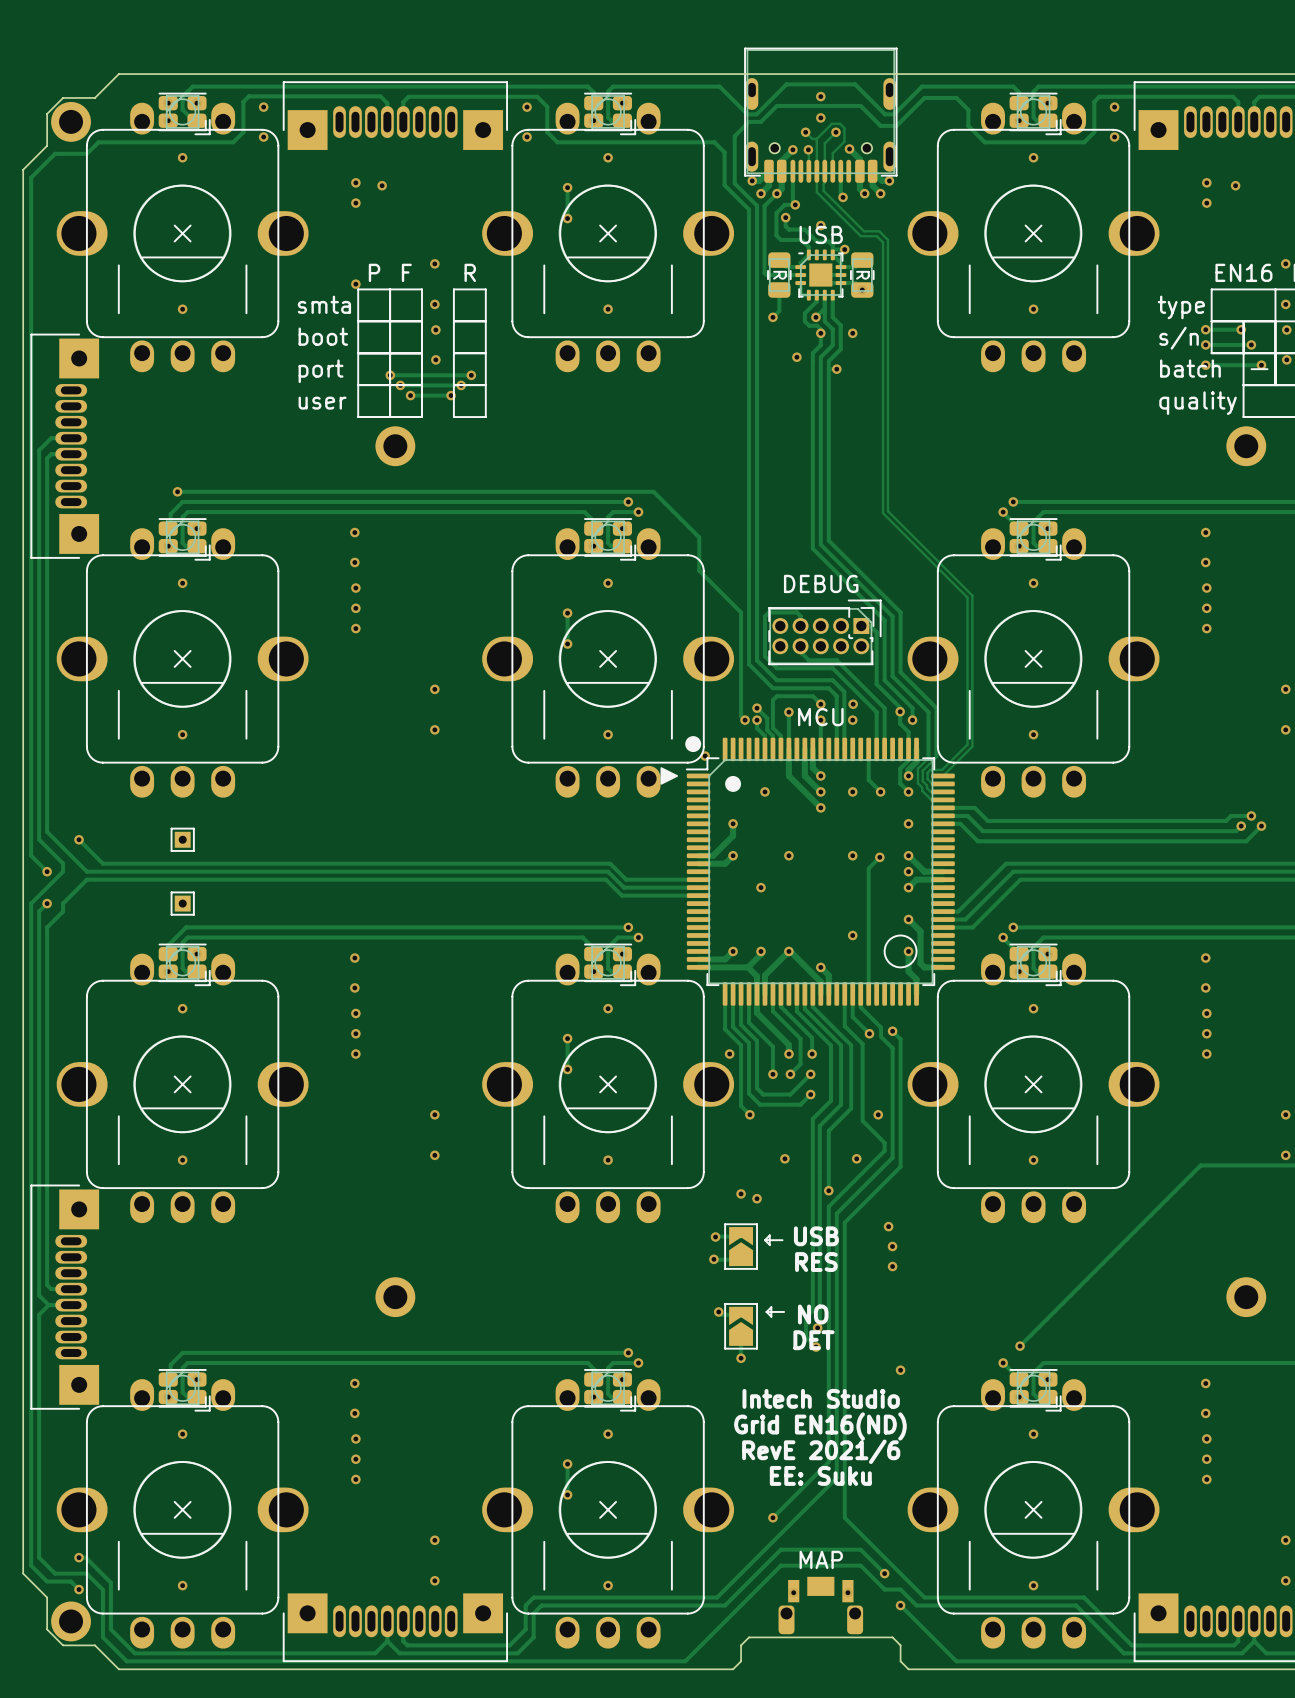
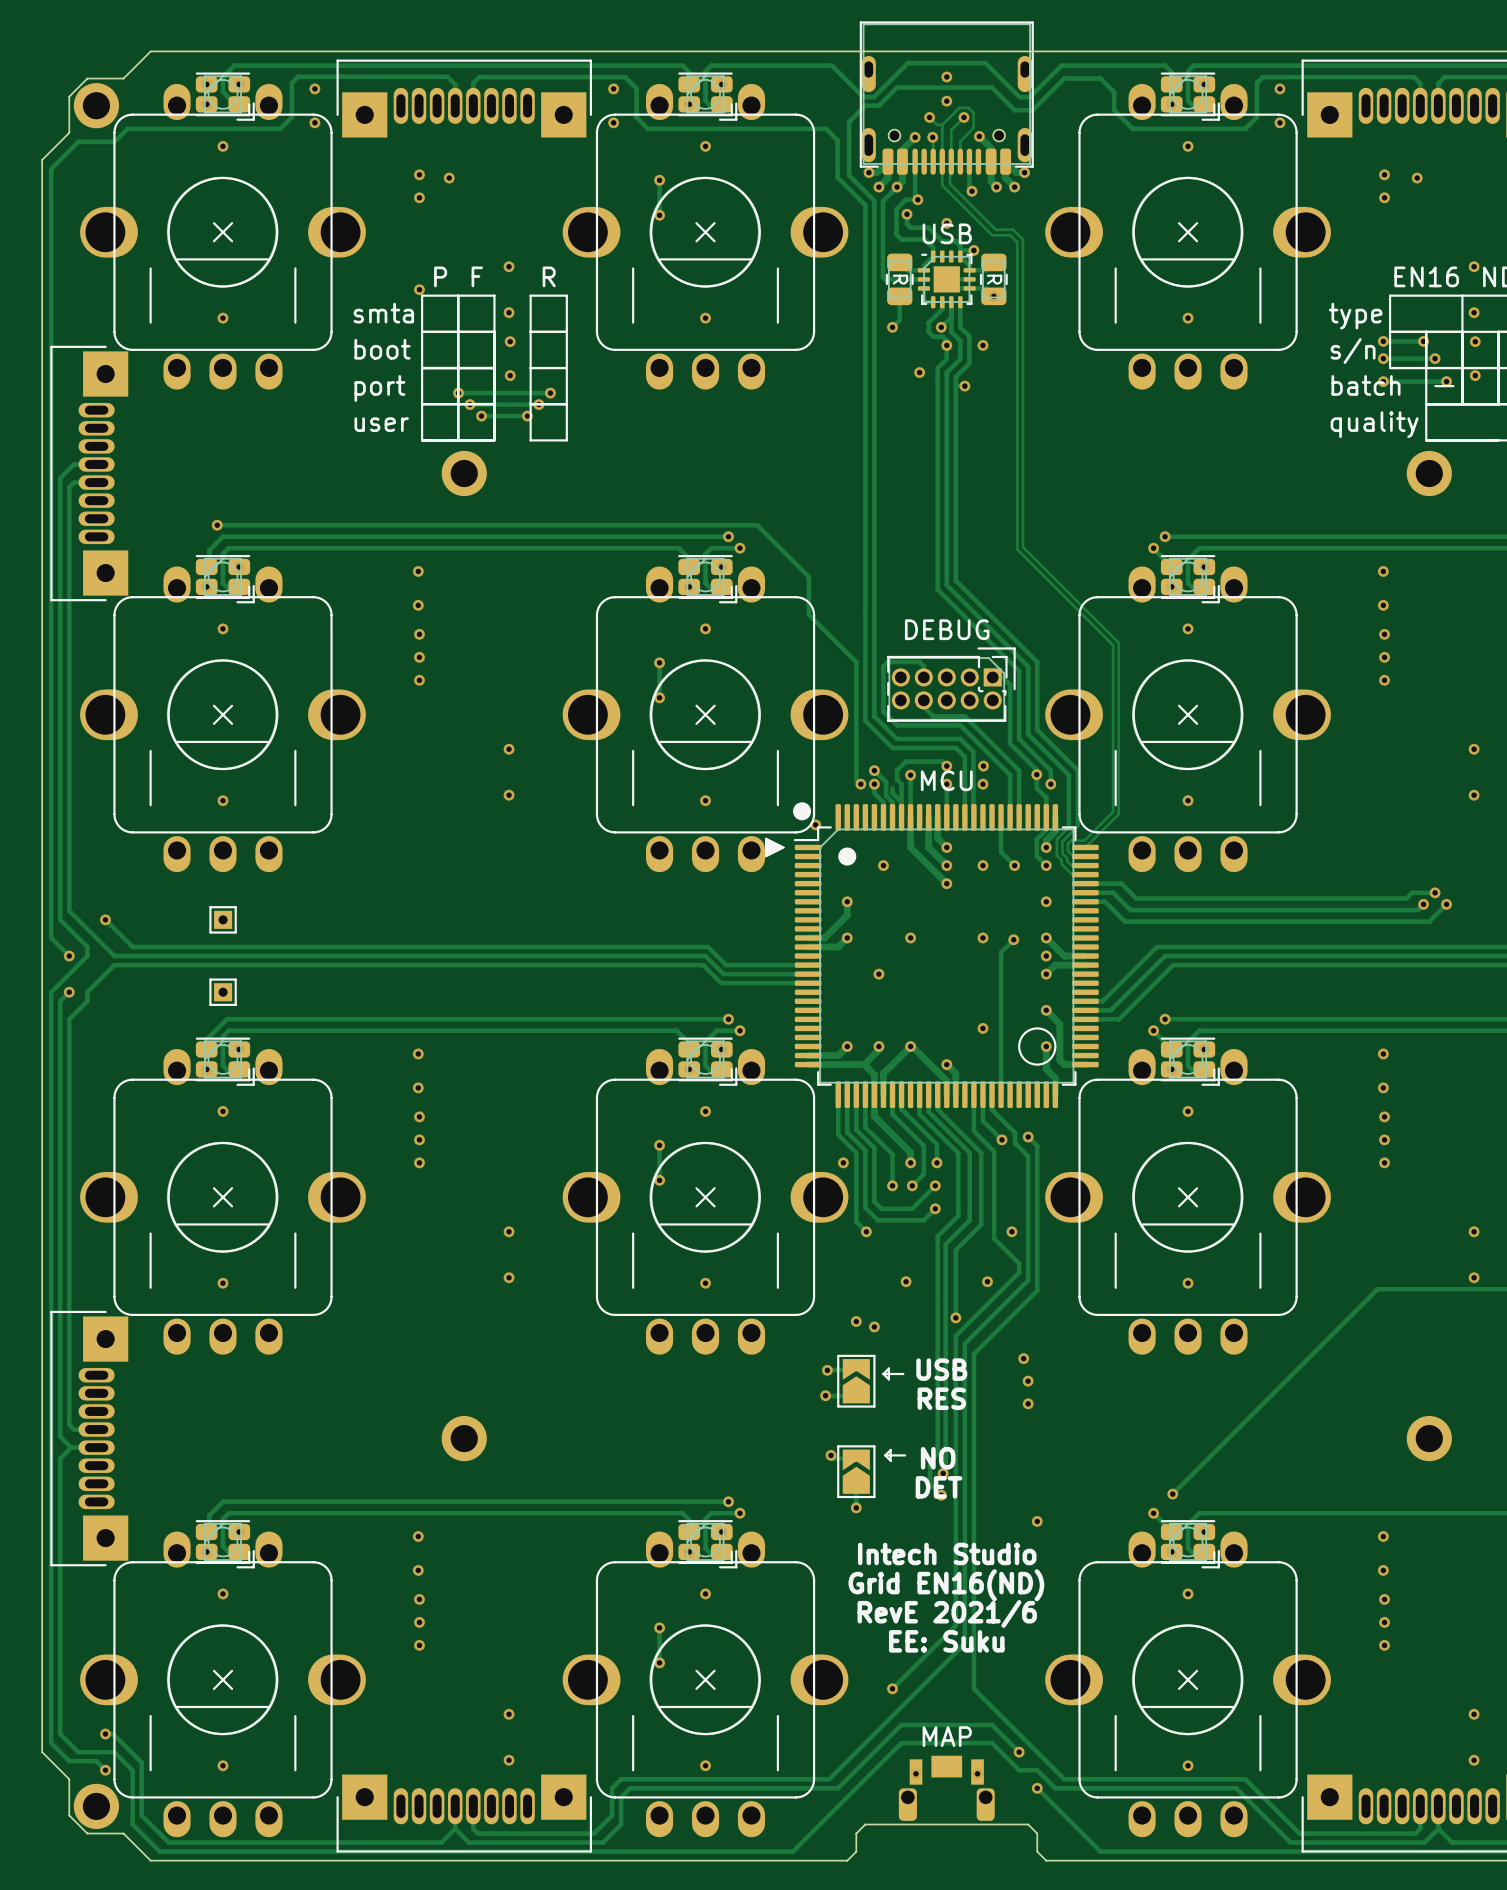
track: (816, 700) (812, 696) (776, 696) (772, 700) (772, 724) -> (942, 761) (906, 761) (897, 770) (897, 779) (901, 784) (901, 802)

